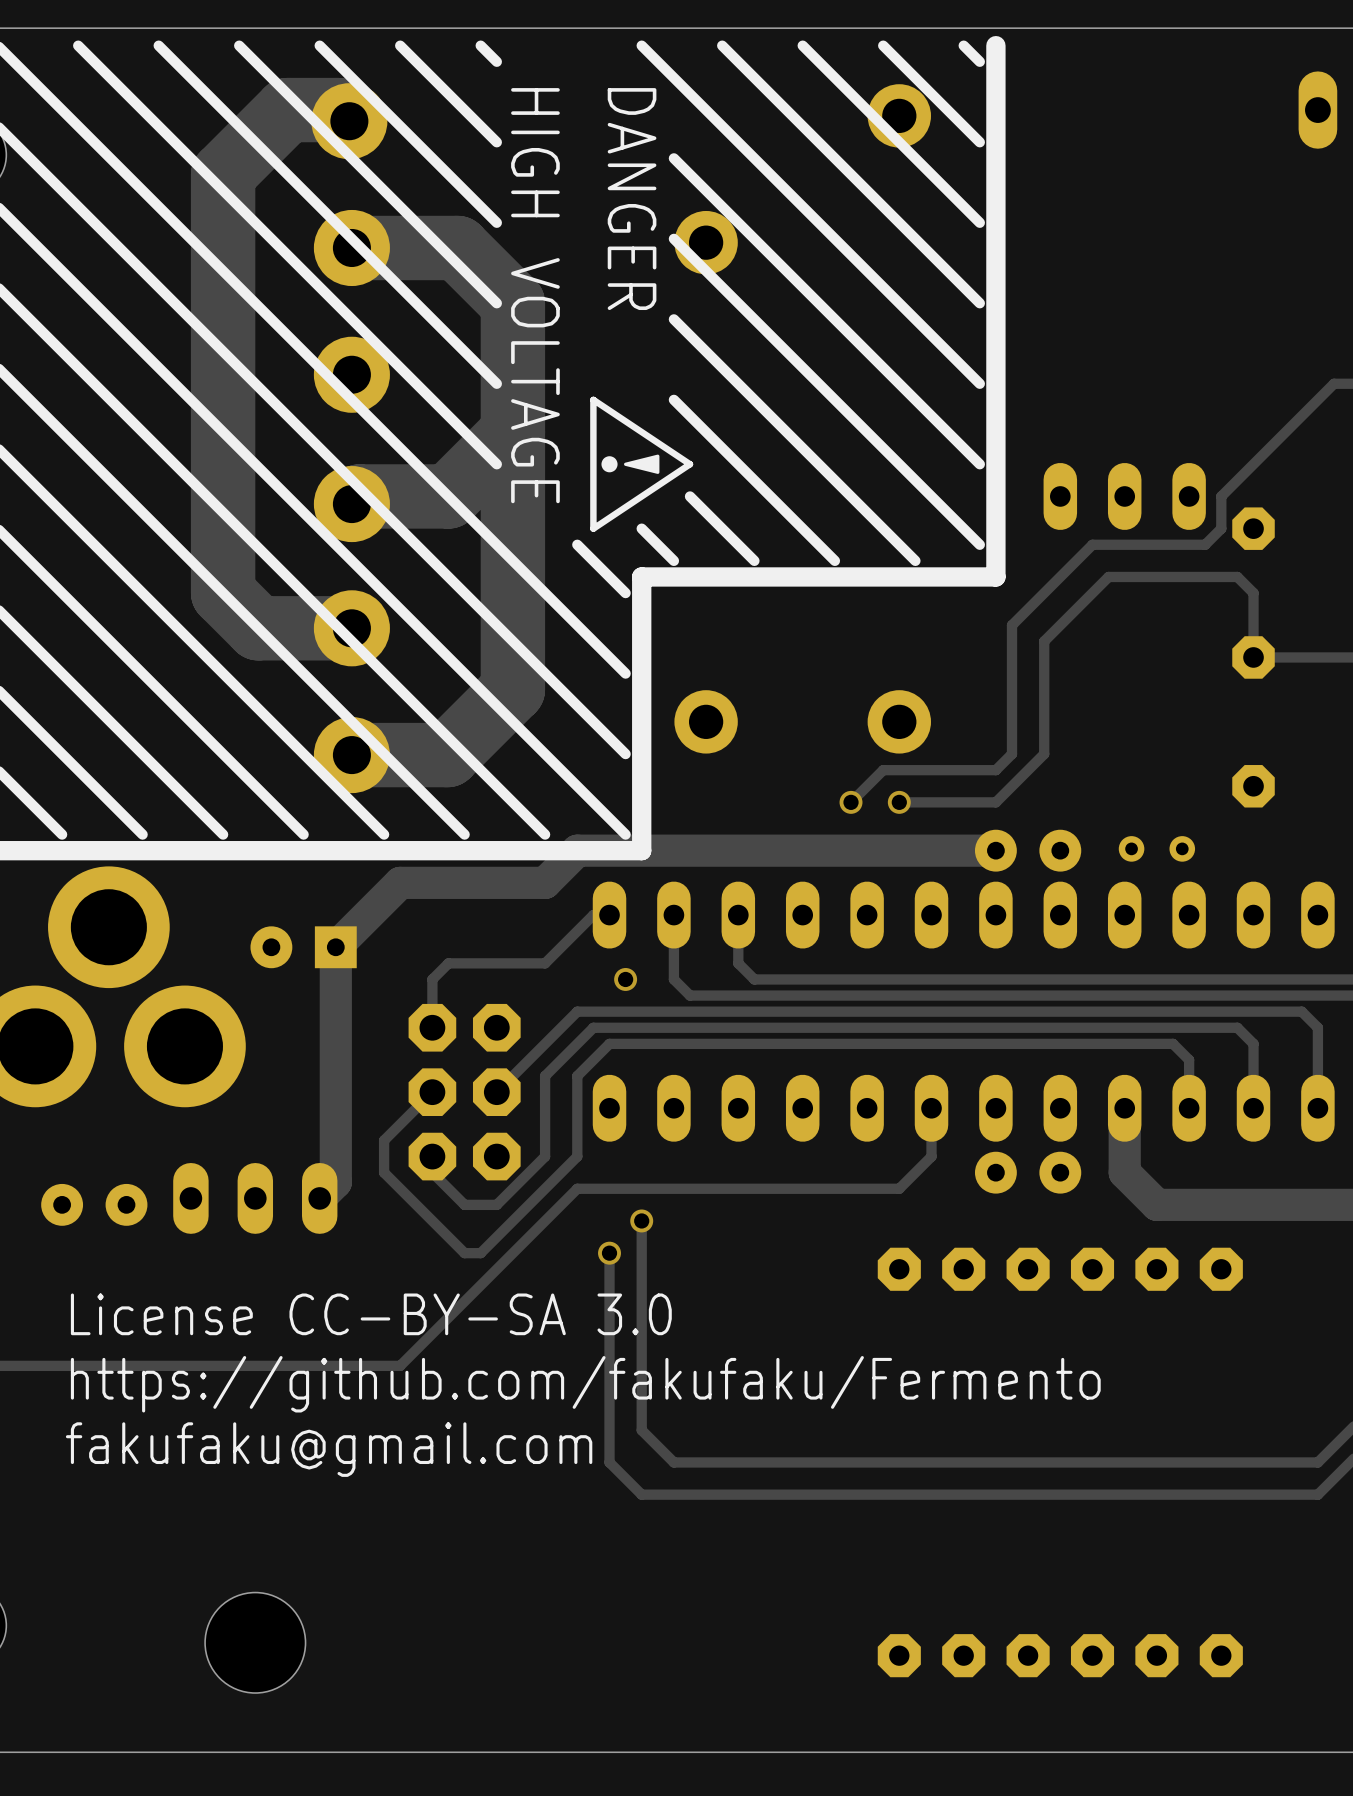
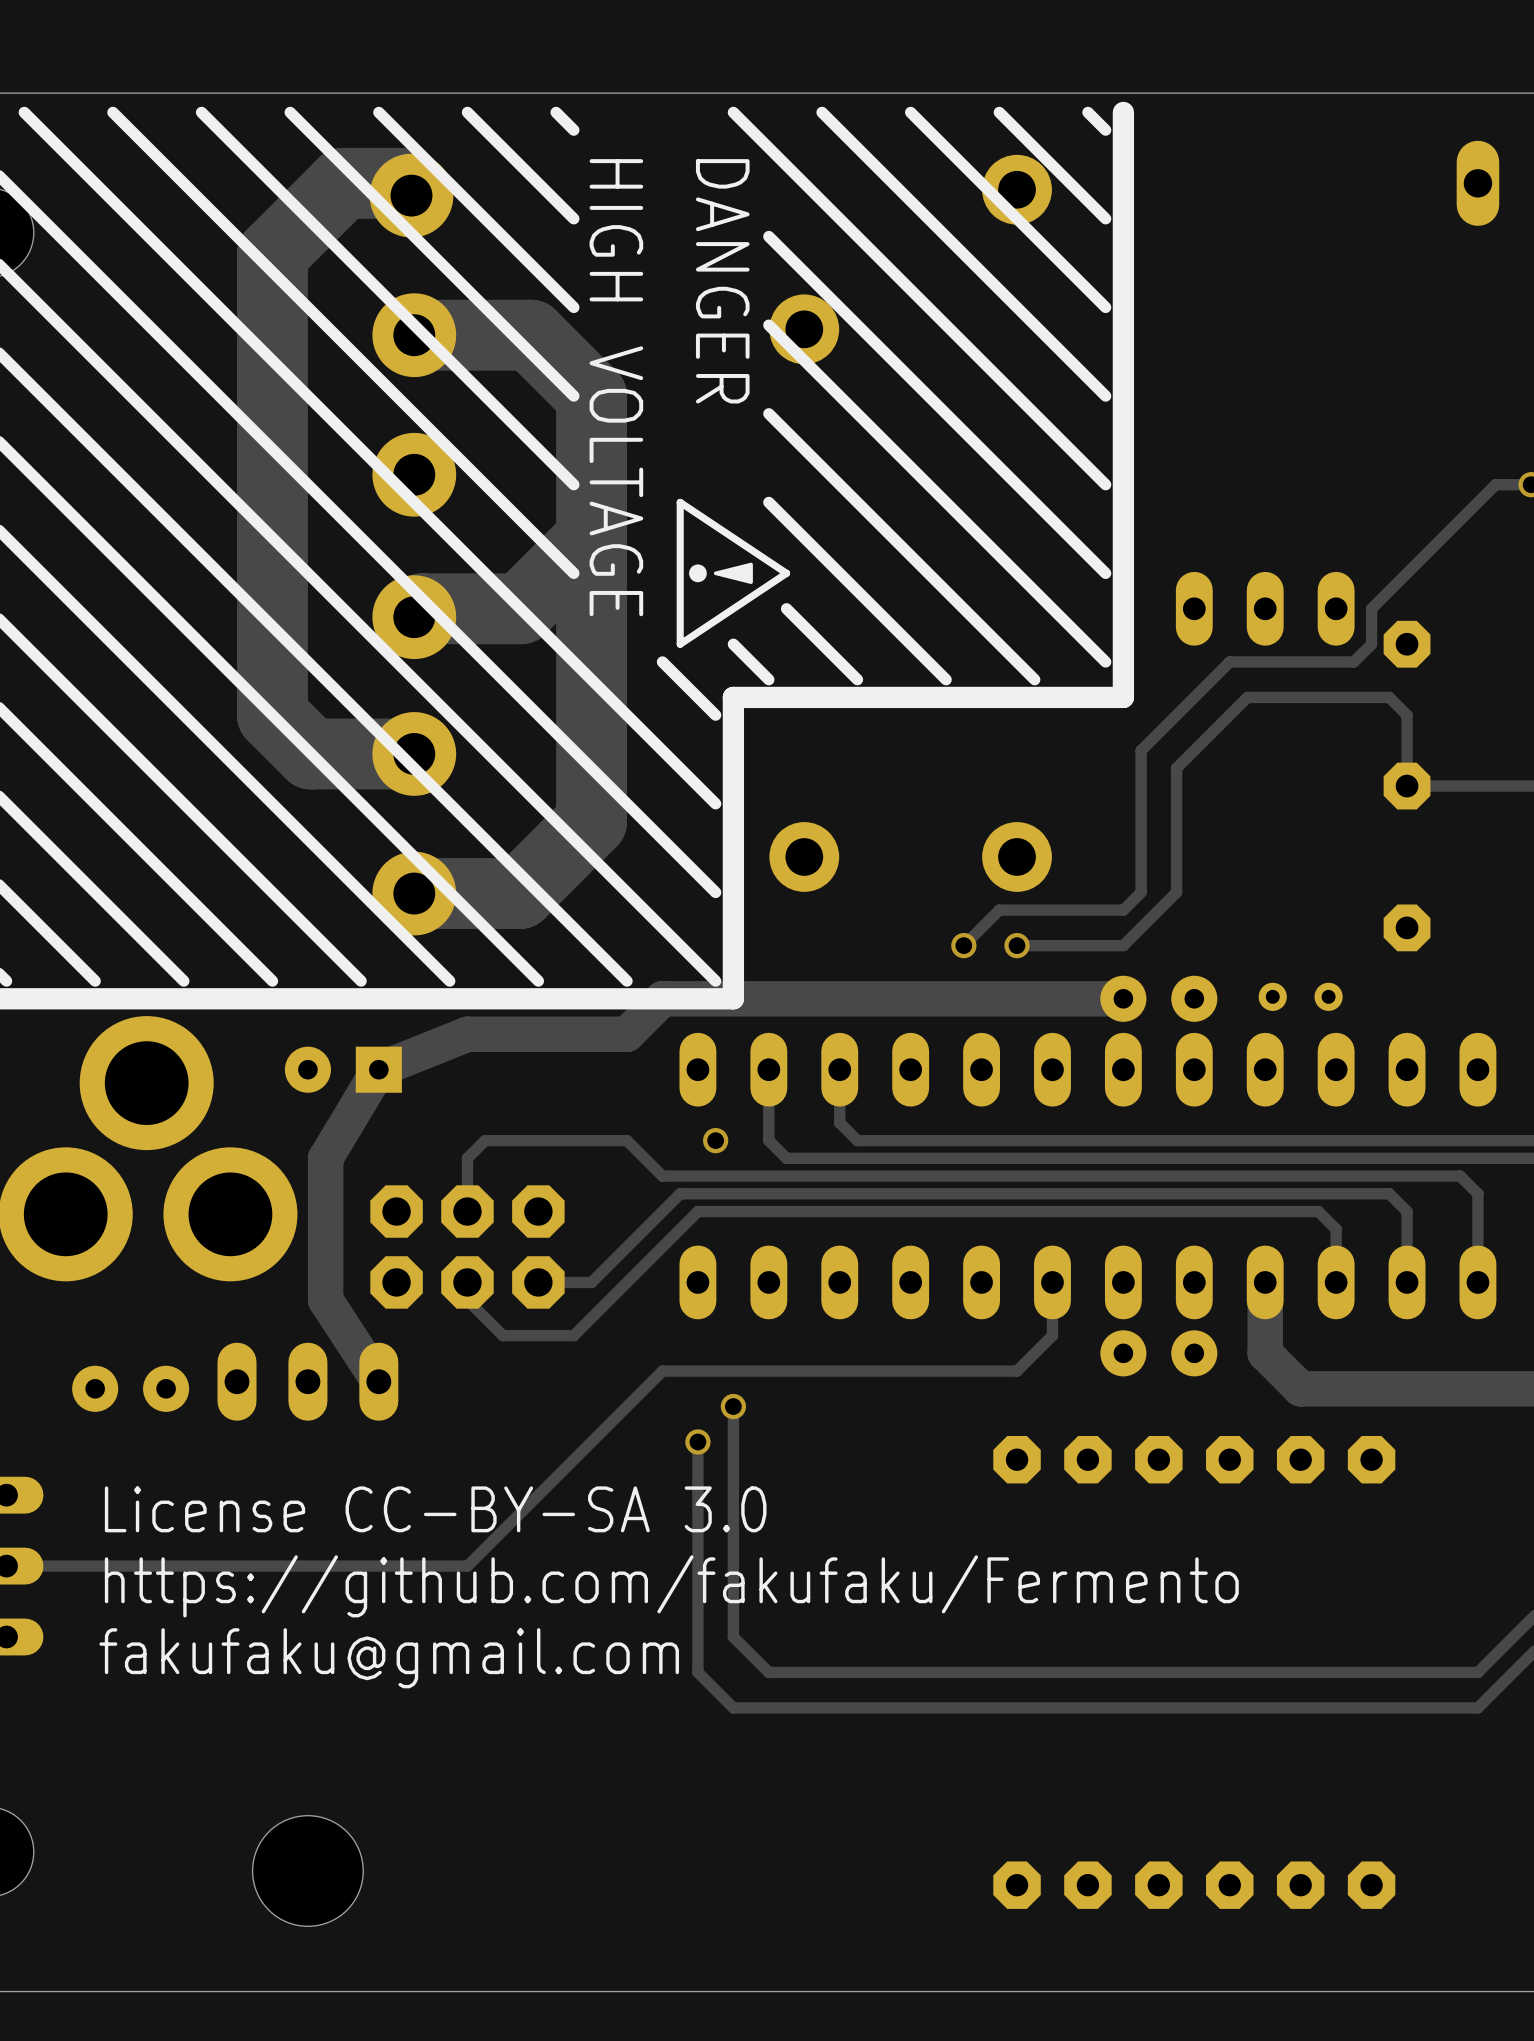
track: (400, 882) (335, 947) (335, 1182) (319, 1198) -> (467, 1034) (378, 1069) (325, 1158) (325, 1300) (378, 1381)
track: (609, 915) (593, 915) (545, 963) (448, 963) (432, 979) (432, 1027) -> none
part position: (303, 947) -> (343, 1069)
track: (577, 1011) (496, 1092) -> (662, 1176) (627, 1140) (485, 1140) (467, 1158) (467, 1211)
track: (545, 1076) (545, 1156) (496, 1204) (464, 1204) (432, 1172) (432, 1156) -> (627, 1246) (591, 1282) (538, 1282)
track: (577, 1076) (577, 1156) (480, 1253) (464, 1253) (384, 1172) (384, 1140) (432, 1092) -> (662, 1246) (573, 1335) (502, 1335) (467, 1300) (467, 1282)
part rotation: 0° (464, 1092) -> 90° clockwise (467, 1246)

